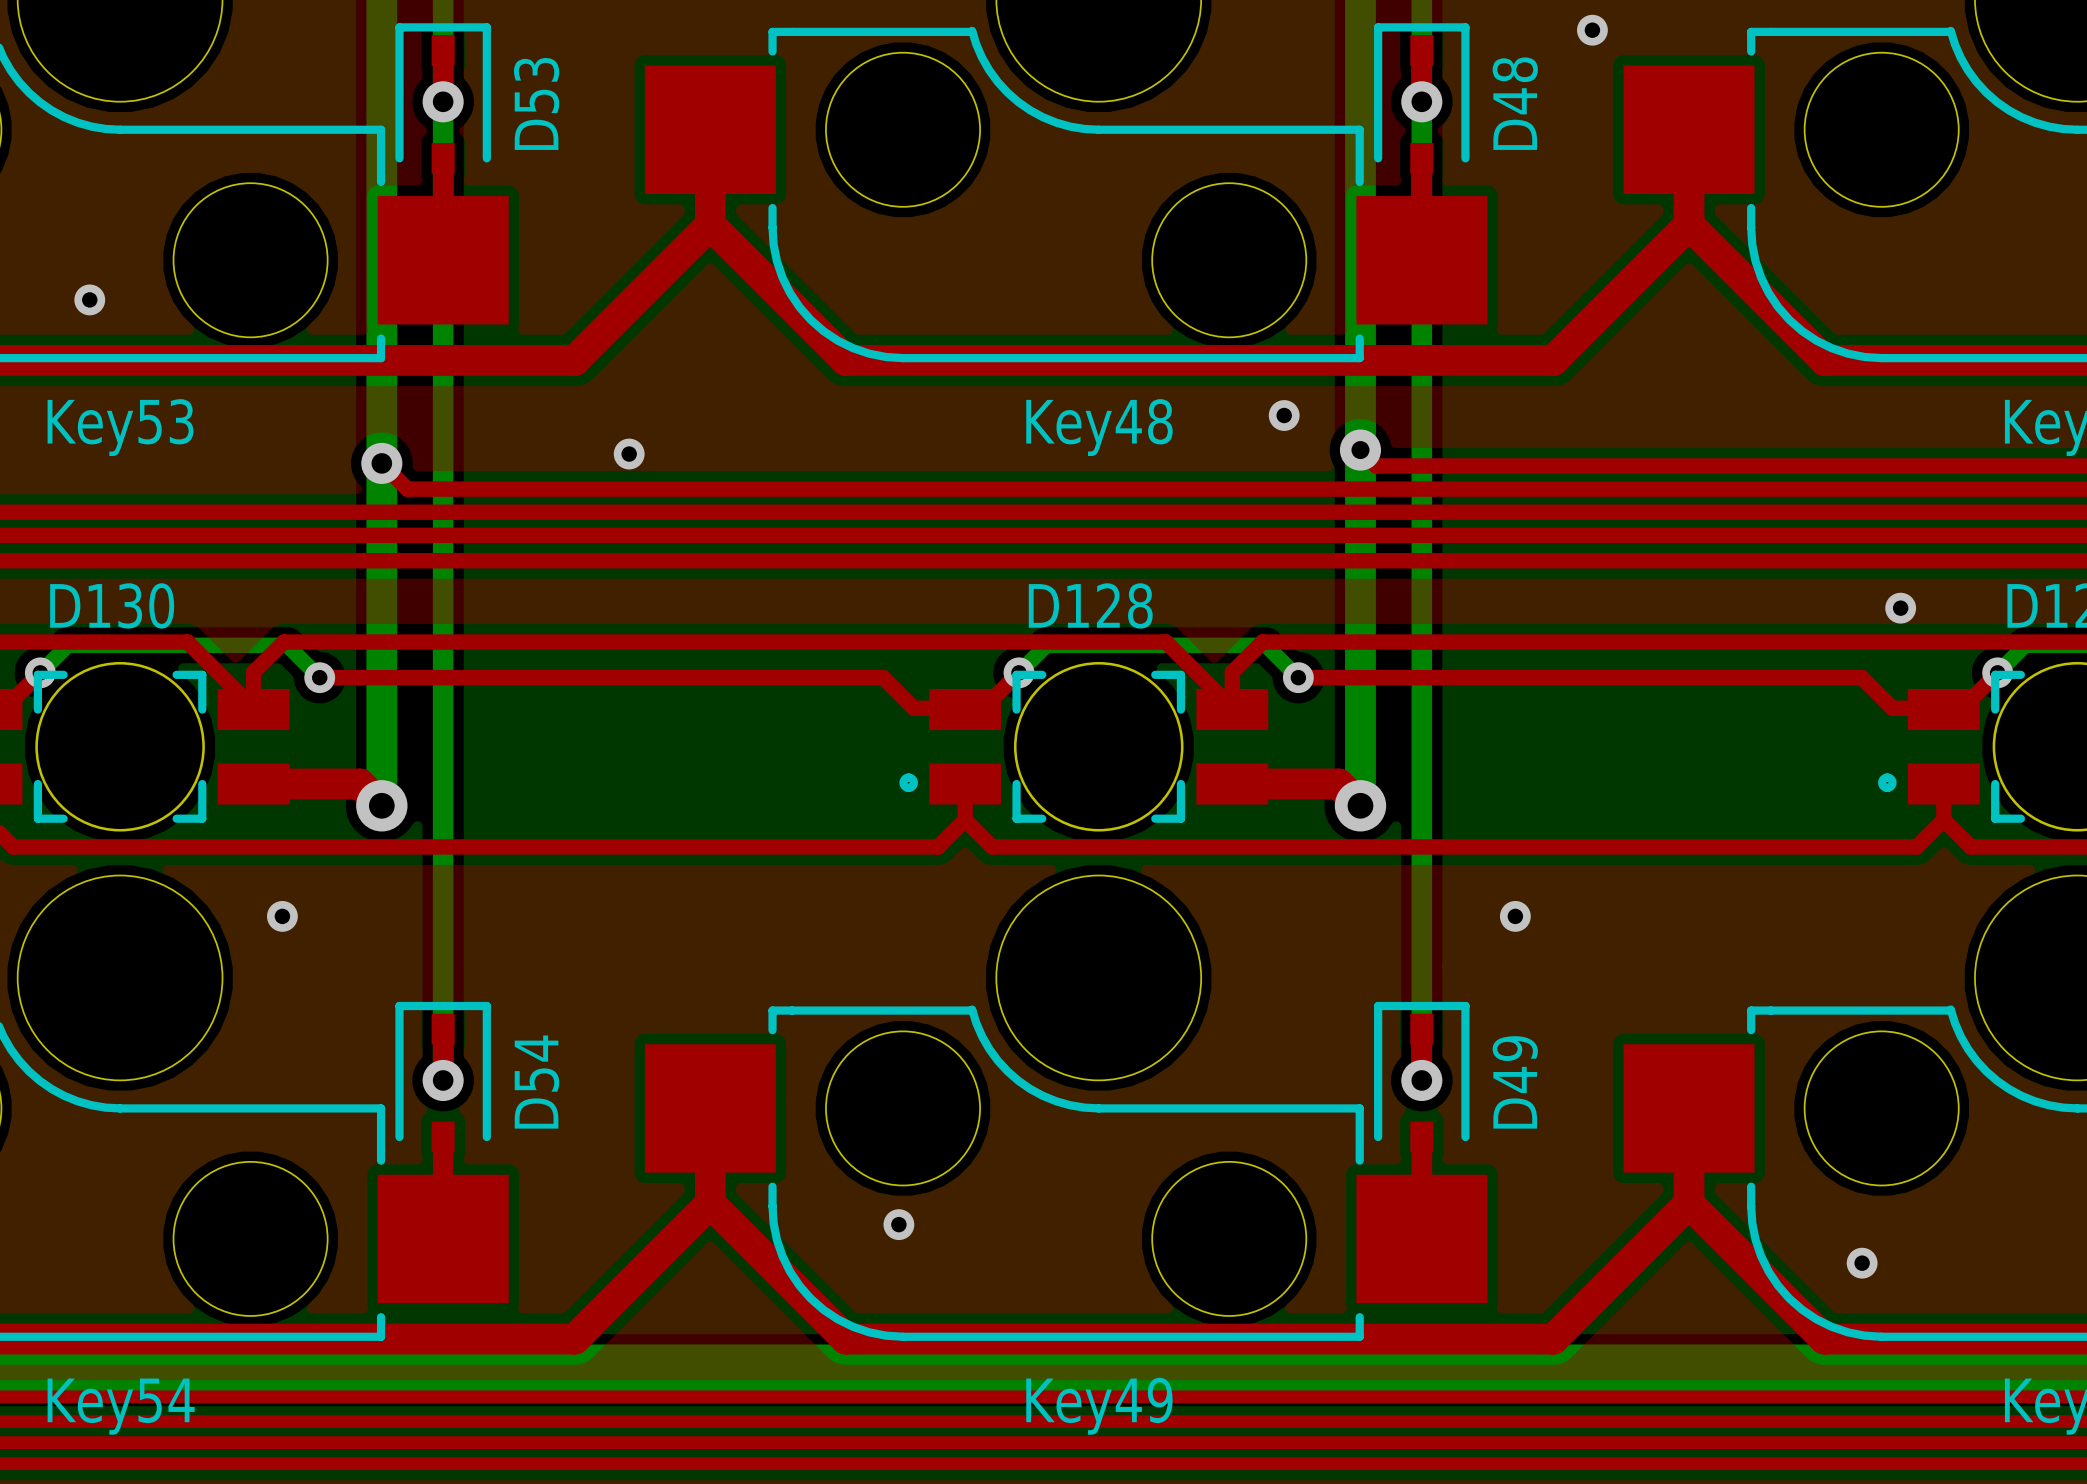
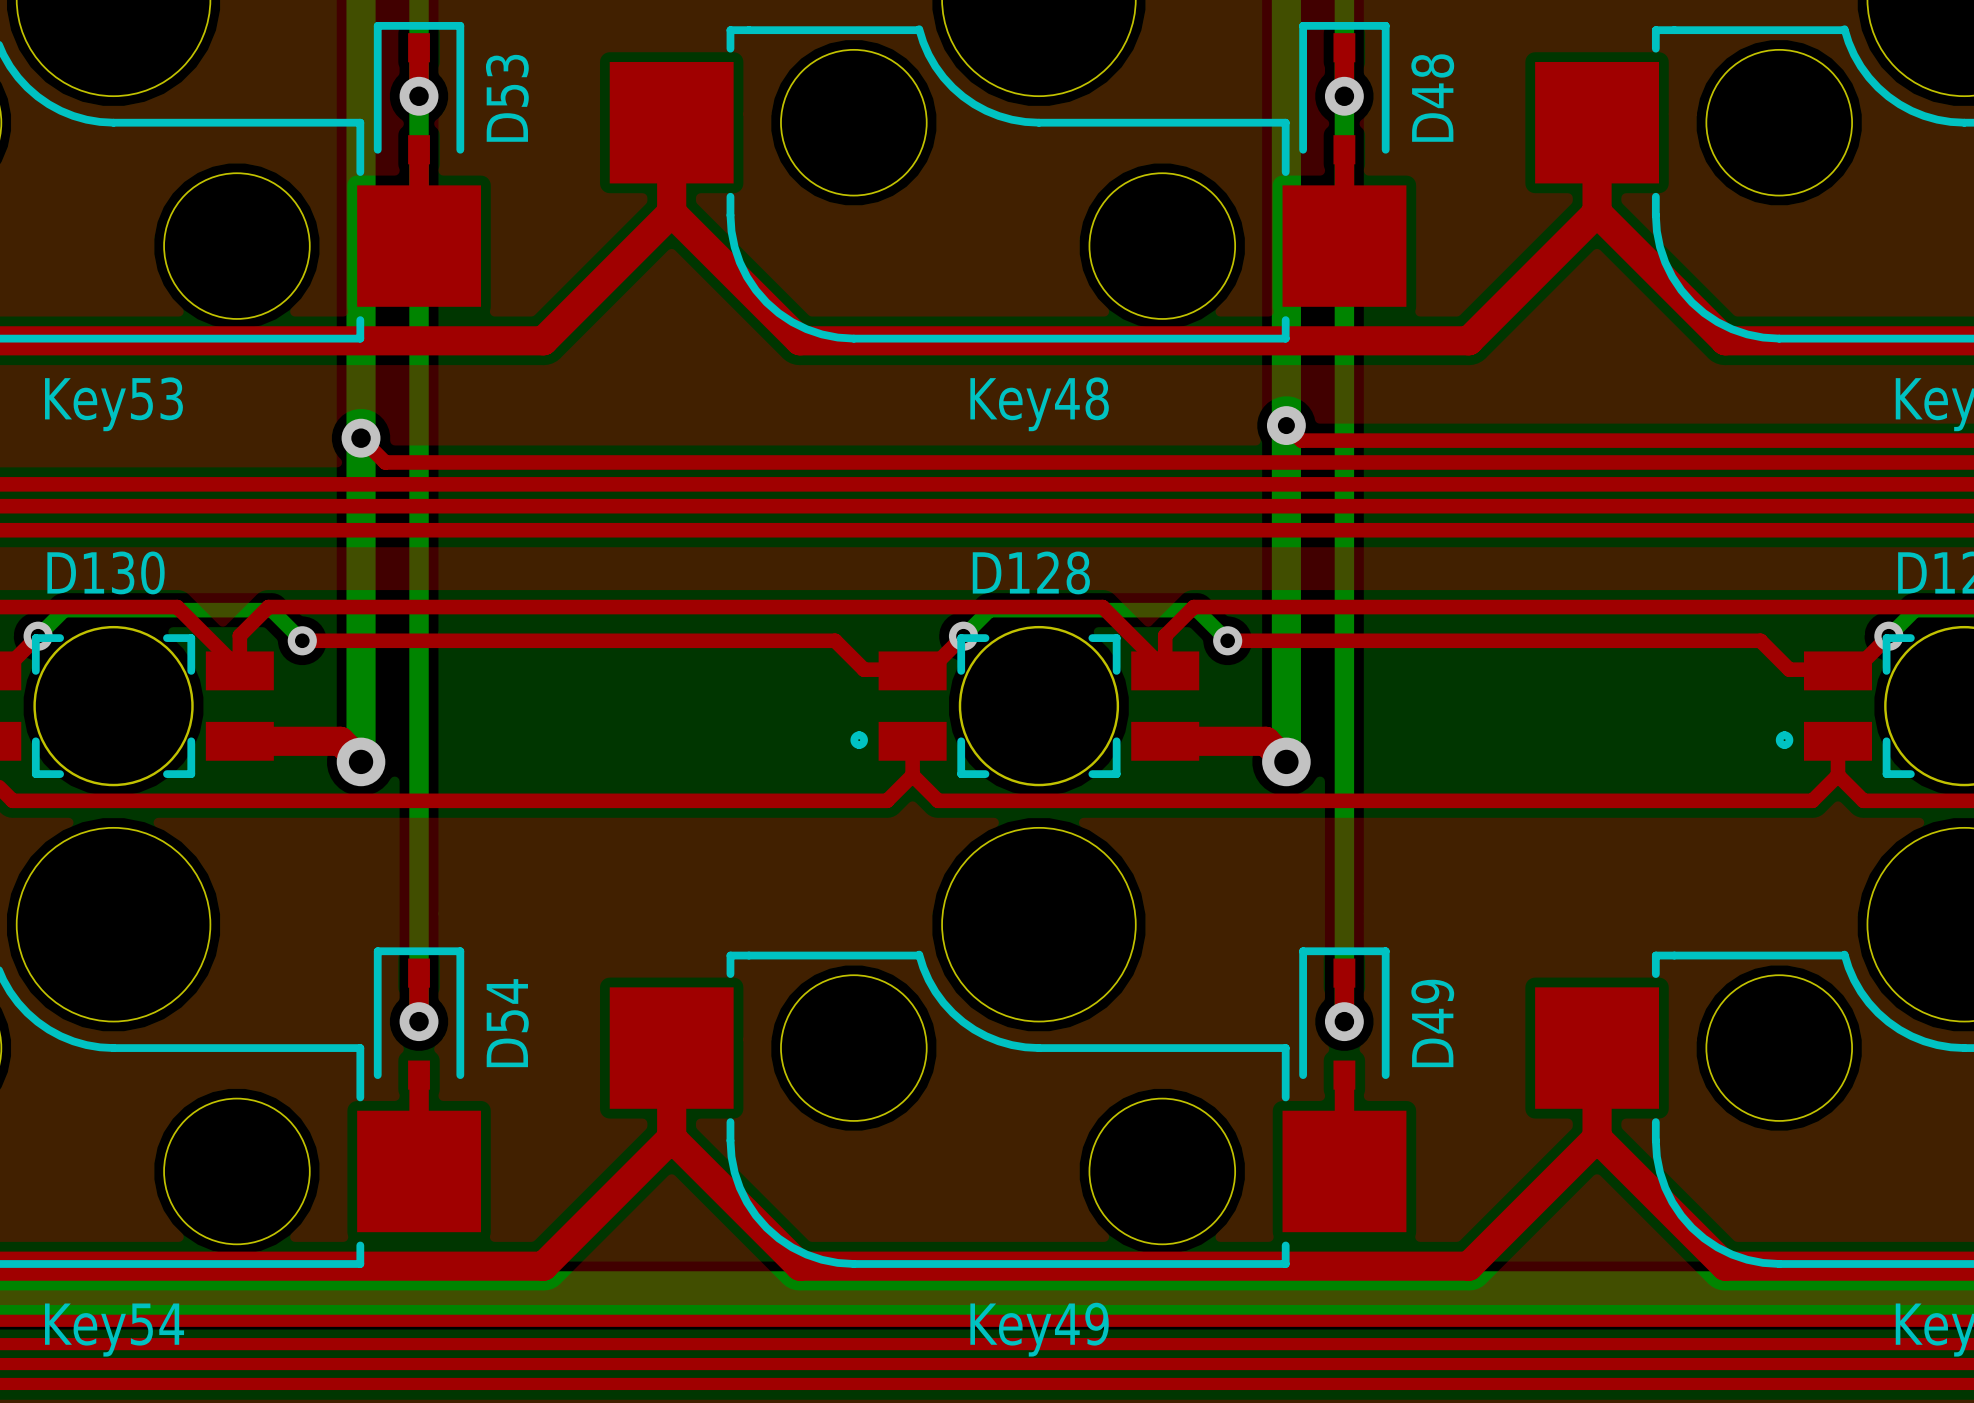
via: (1592, 30) -> none
via: (89, 299) -> none
via: (1284, 415) -> none
via: (629, 454) -> none
via: (1900, 608) -> none
via: (282, 916) -> none
via: (1515, 916) -> none
via: (898, 1224) -> none
via: (1862, 1263) -> none

